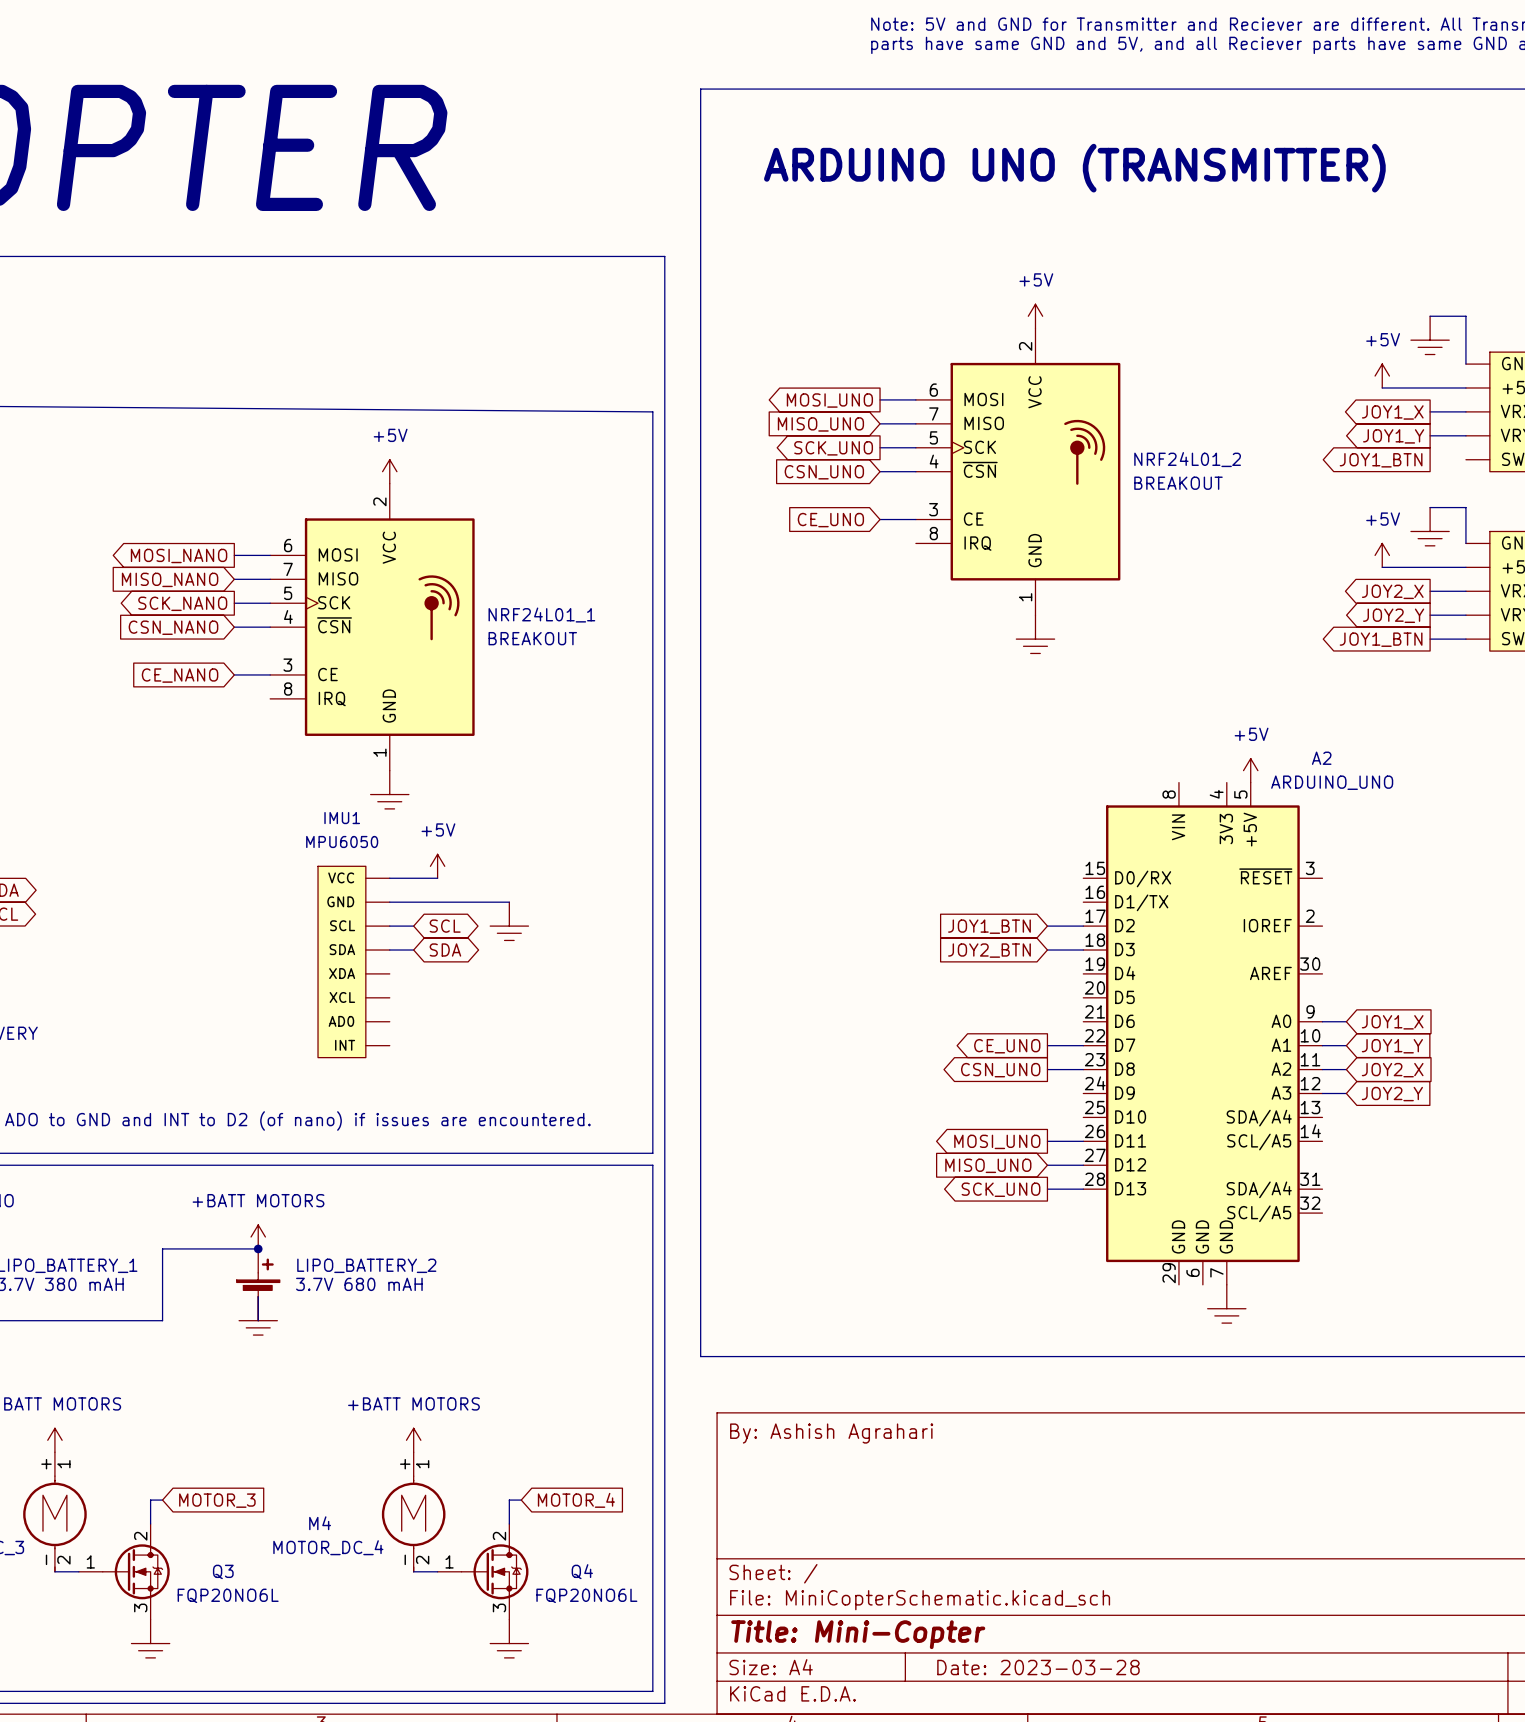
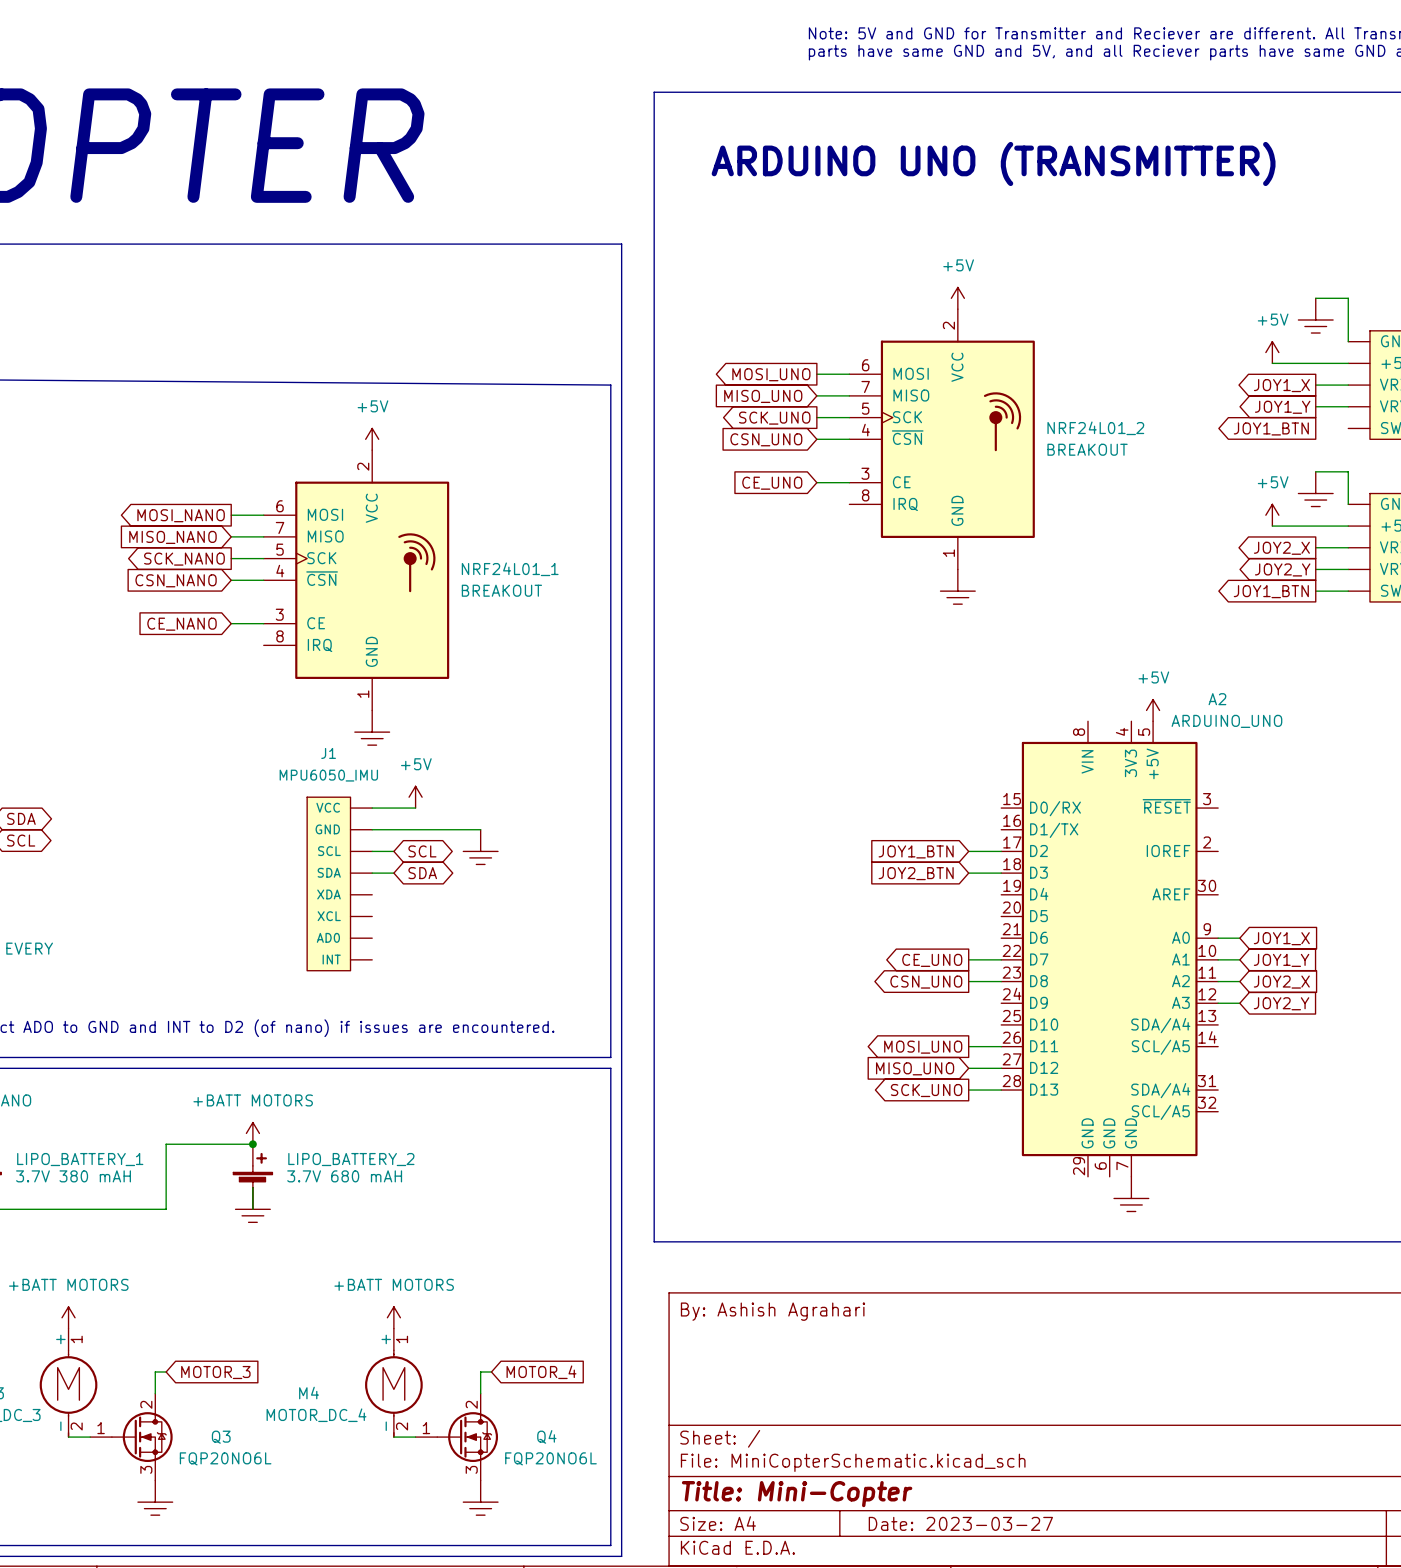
IMU1 name: IMU1 (342, 818) -> J1 (328, 753)
IMU1 value: MPU6050 (342, 841) -> MPU6050_IMU (328, 775)
title block: Date: 2023-03-28 (1038, 1667) -> Date: 2023-03-27 (960, 1523)

